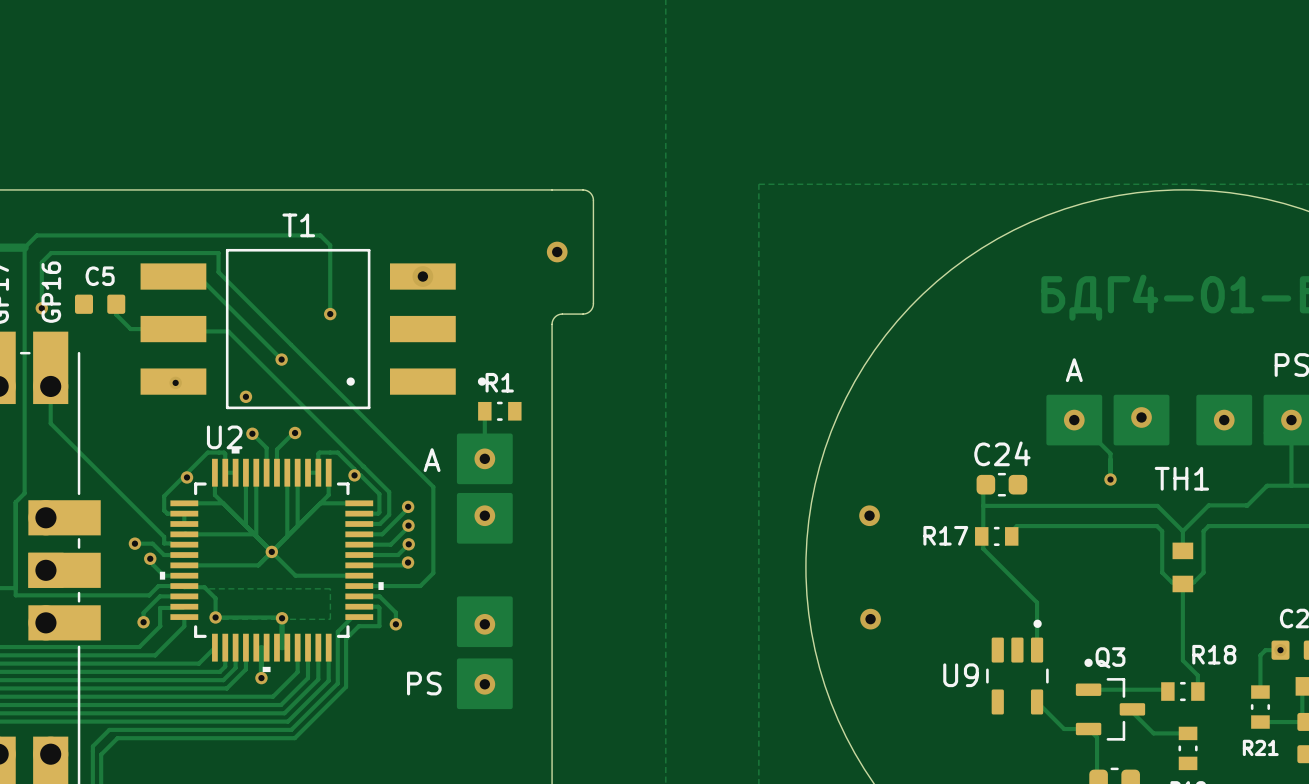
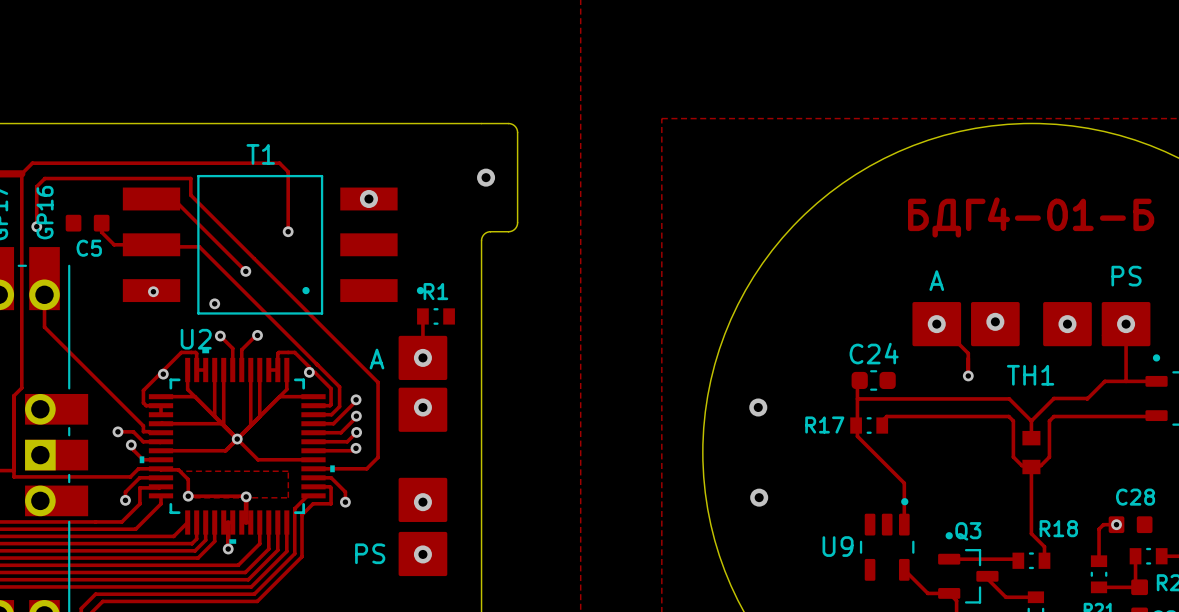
C5 name position: C5 (100, 276) -> C5 (89, 248)

